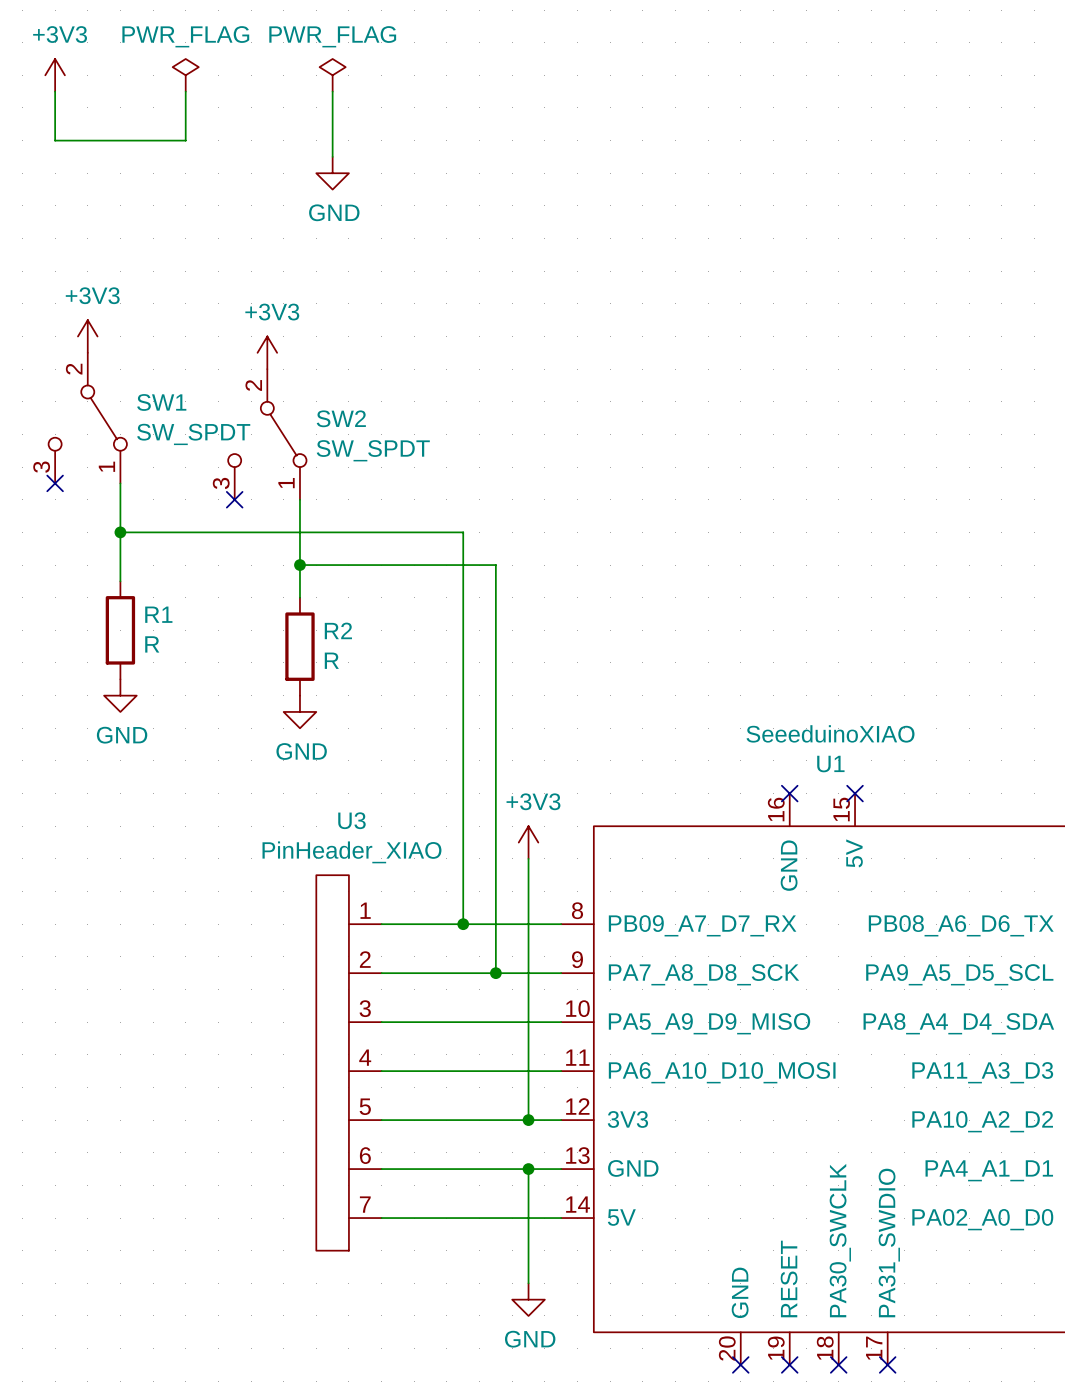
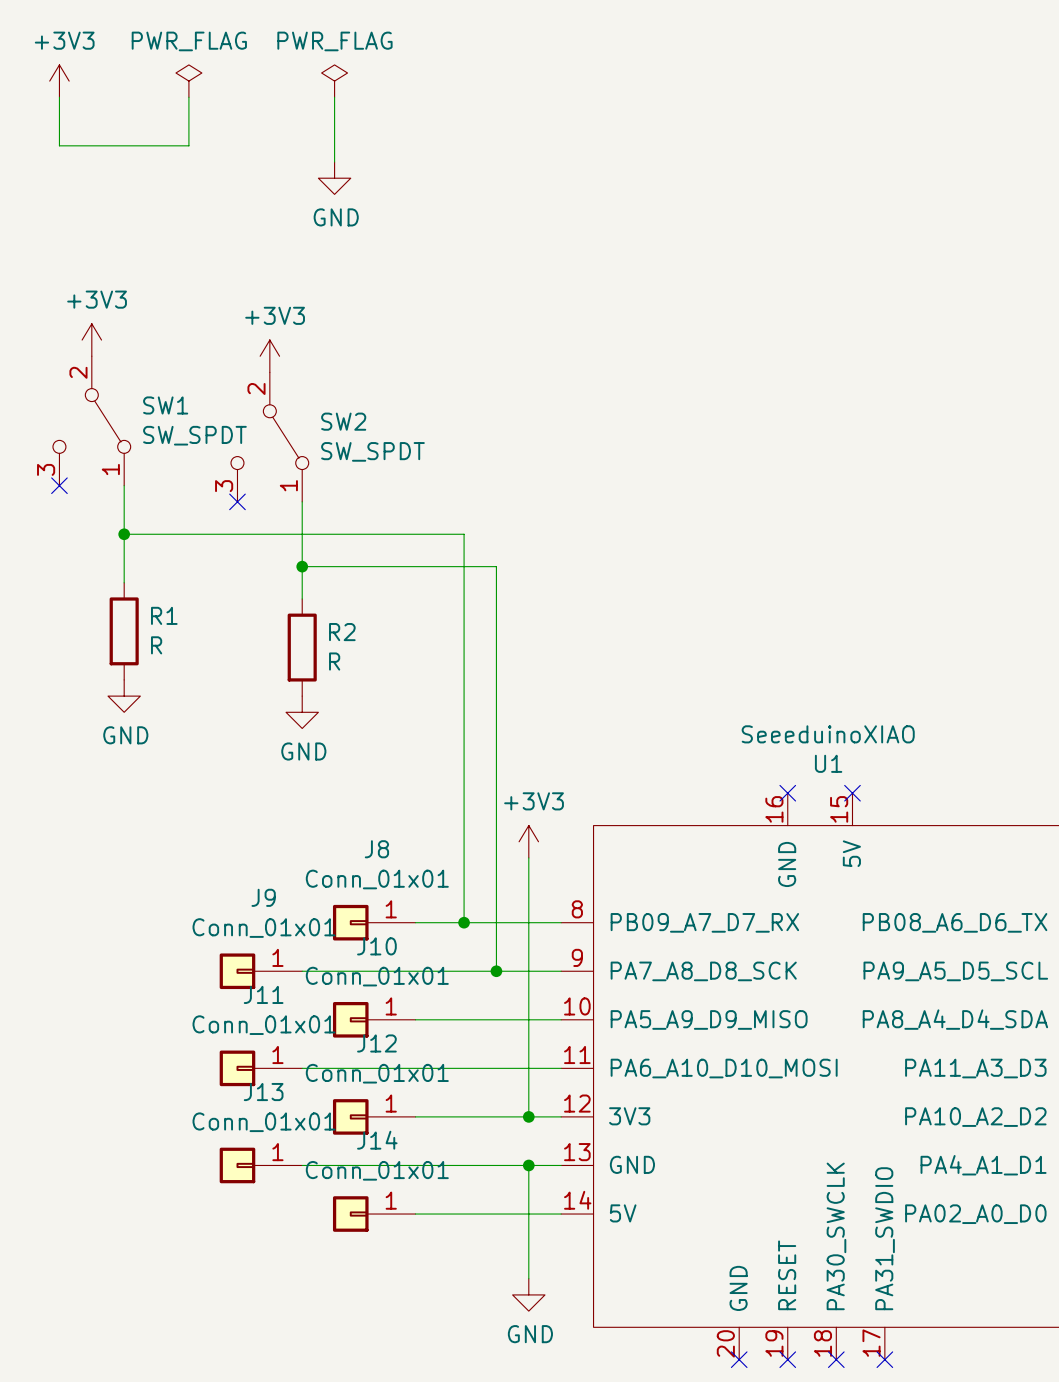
J8: none -> Conn_01x01 (374, 922)
J9: none -> Conn_01x01 (260, 971)
wire: none -> (302, 971) (383, 971)
J10: none -> Conn_01x01 (374, 1019)
U3: PinHeader_XIAO (348, 1062) -> none
J11: none -> Conn_01x01 (260, 1068)
wire: none -> (302, 1068) (383, 1068)
J12: none -> Conn_01x01 (374, 1116)
J13: none -> Conn_01x01 (260, 1165)
wire: none -> (302, 1165) (383, 1165)
J14: none -> Conn_01x01 (374, 1214)

